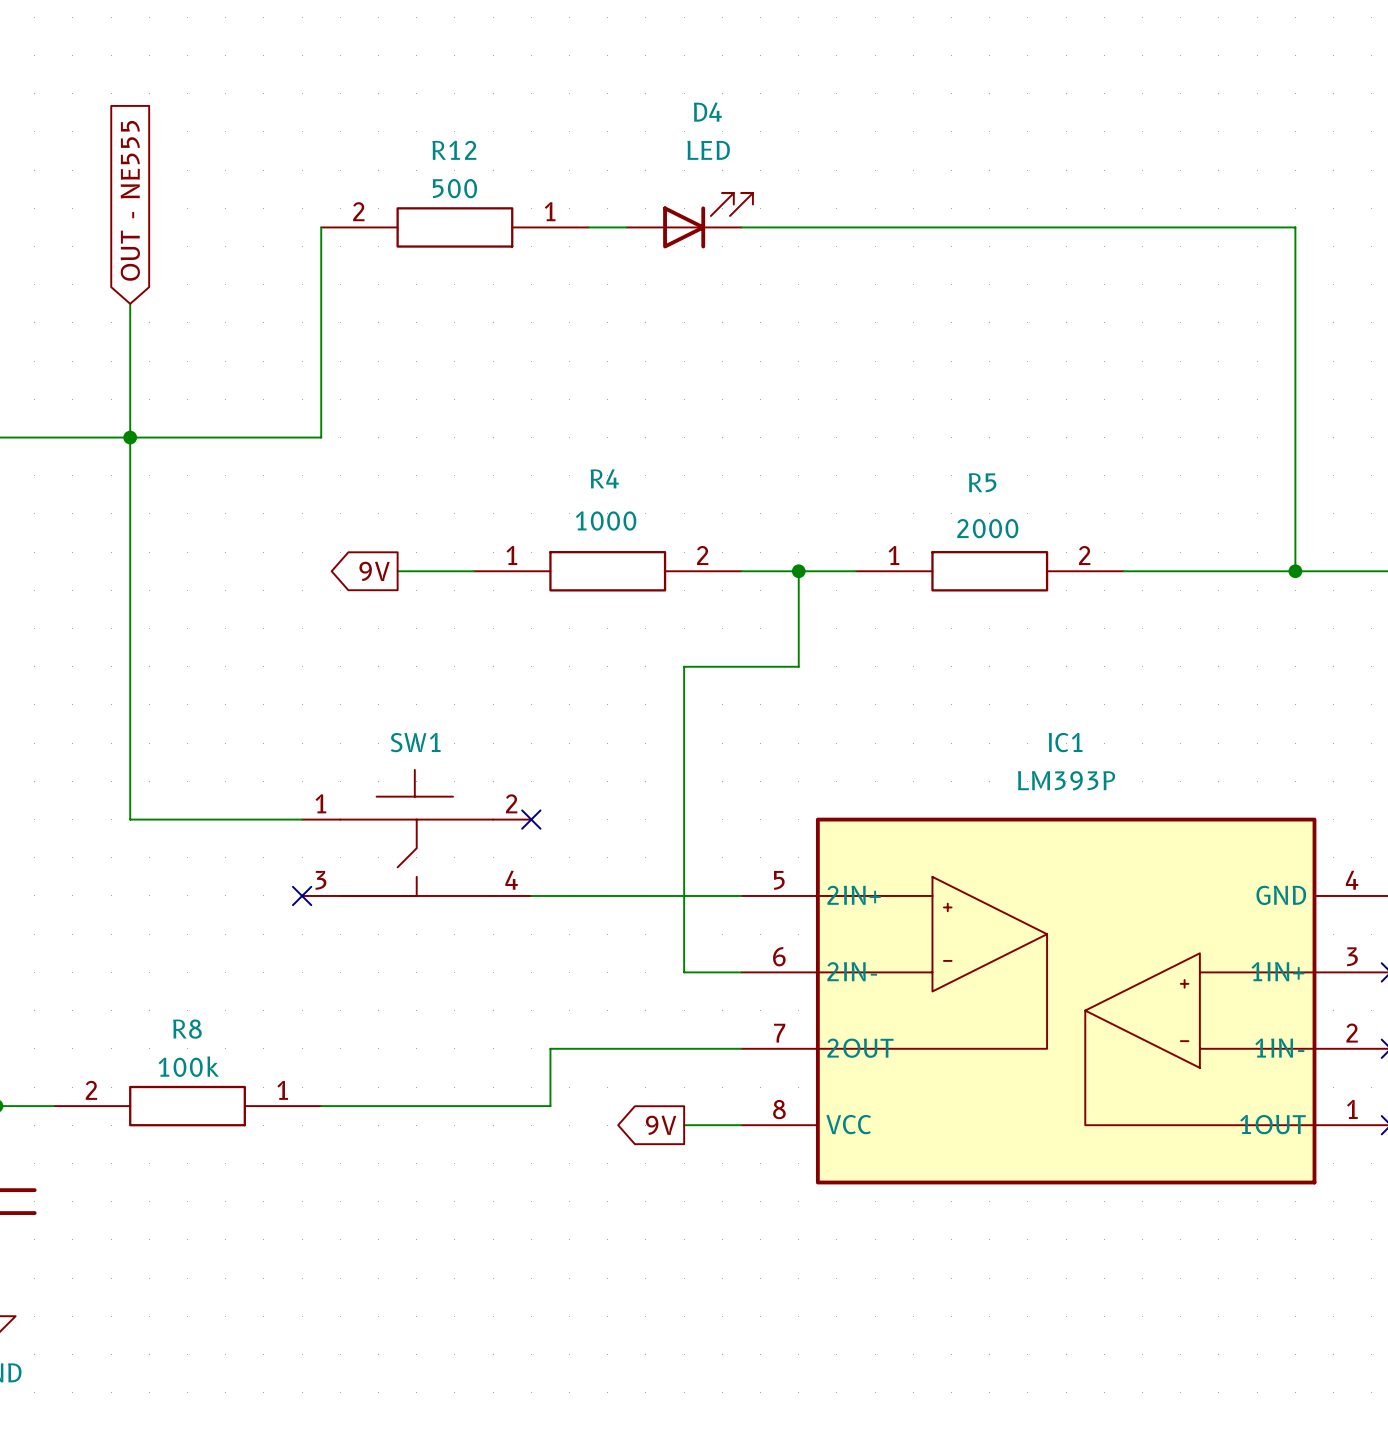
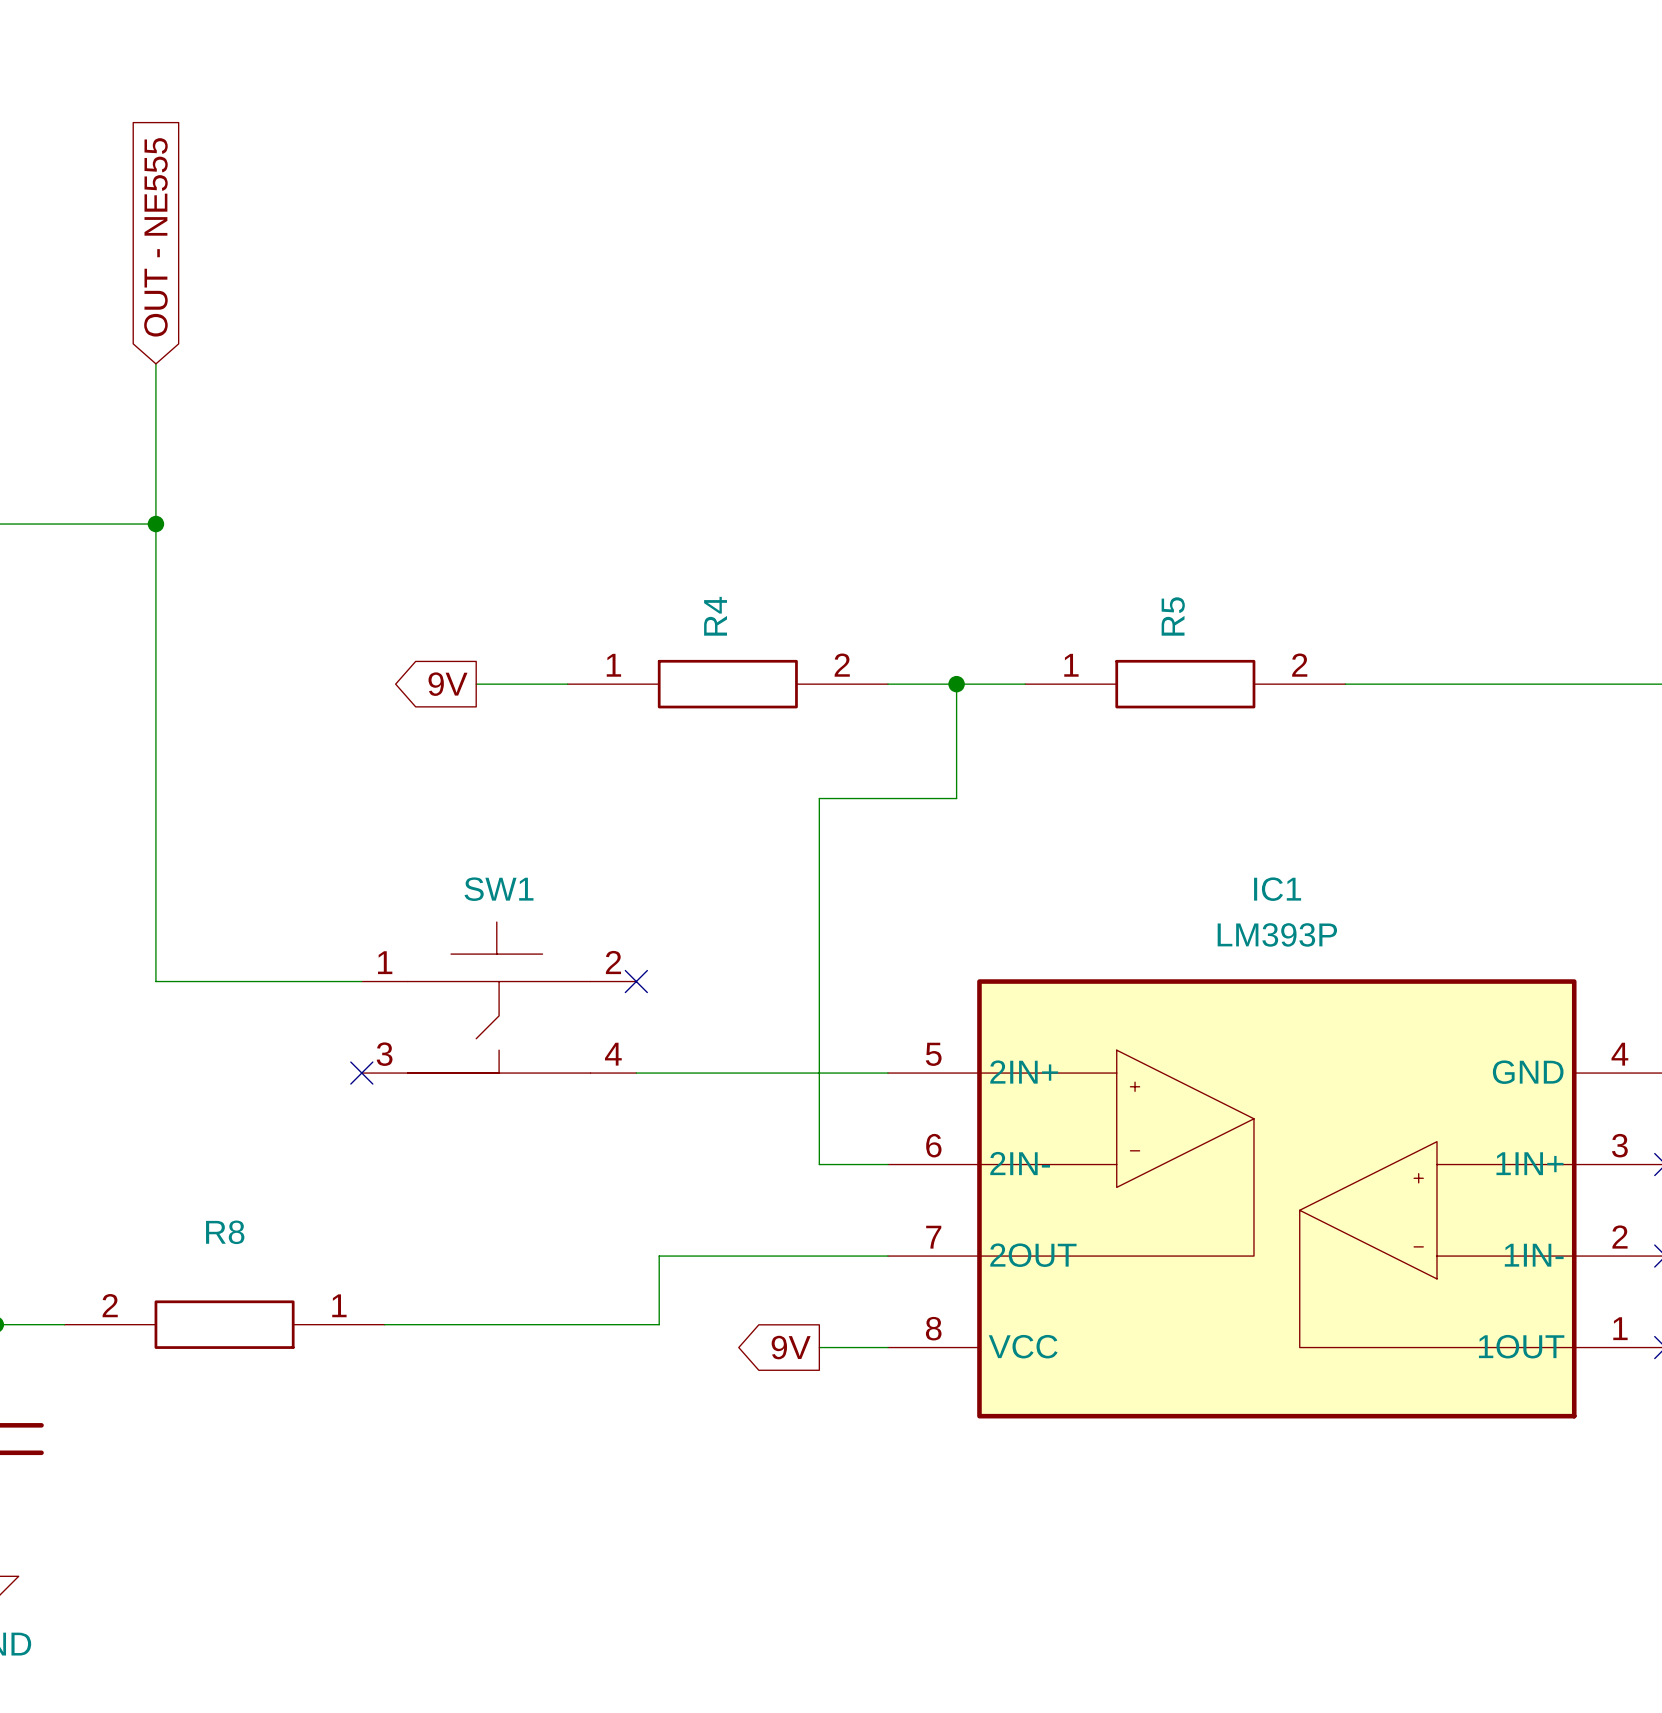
D4: LED (689, 220) -> none
wire: (321, 227) (321, 437) (130, 437) -> none
R12: 500 (454, 227) -> none
wire: (588, 227) (626, 227) -> none
wire: (741, 227) (1295, 227) (1295, 571) -> none
R4 name rotation: 0° (604, 478) -> 90° counterclockwise (715, 616)
R5 name rotation: 0° (982, 482) -> 90° counterclockwise (1173, 616)
R4 value: 1000 (606, 520) -> none
R5 value: 2000 (987, 528) -> none
junction: (1295, 571) -> none
R8 value: 100k (188, 1066) -> none

